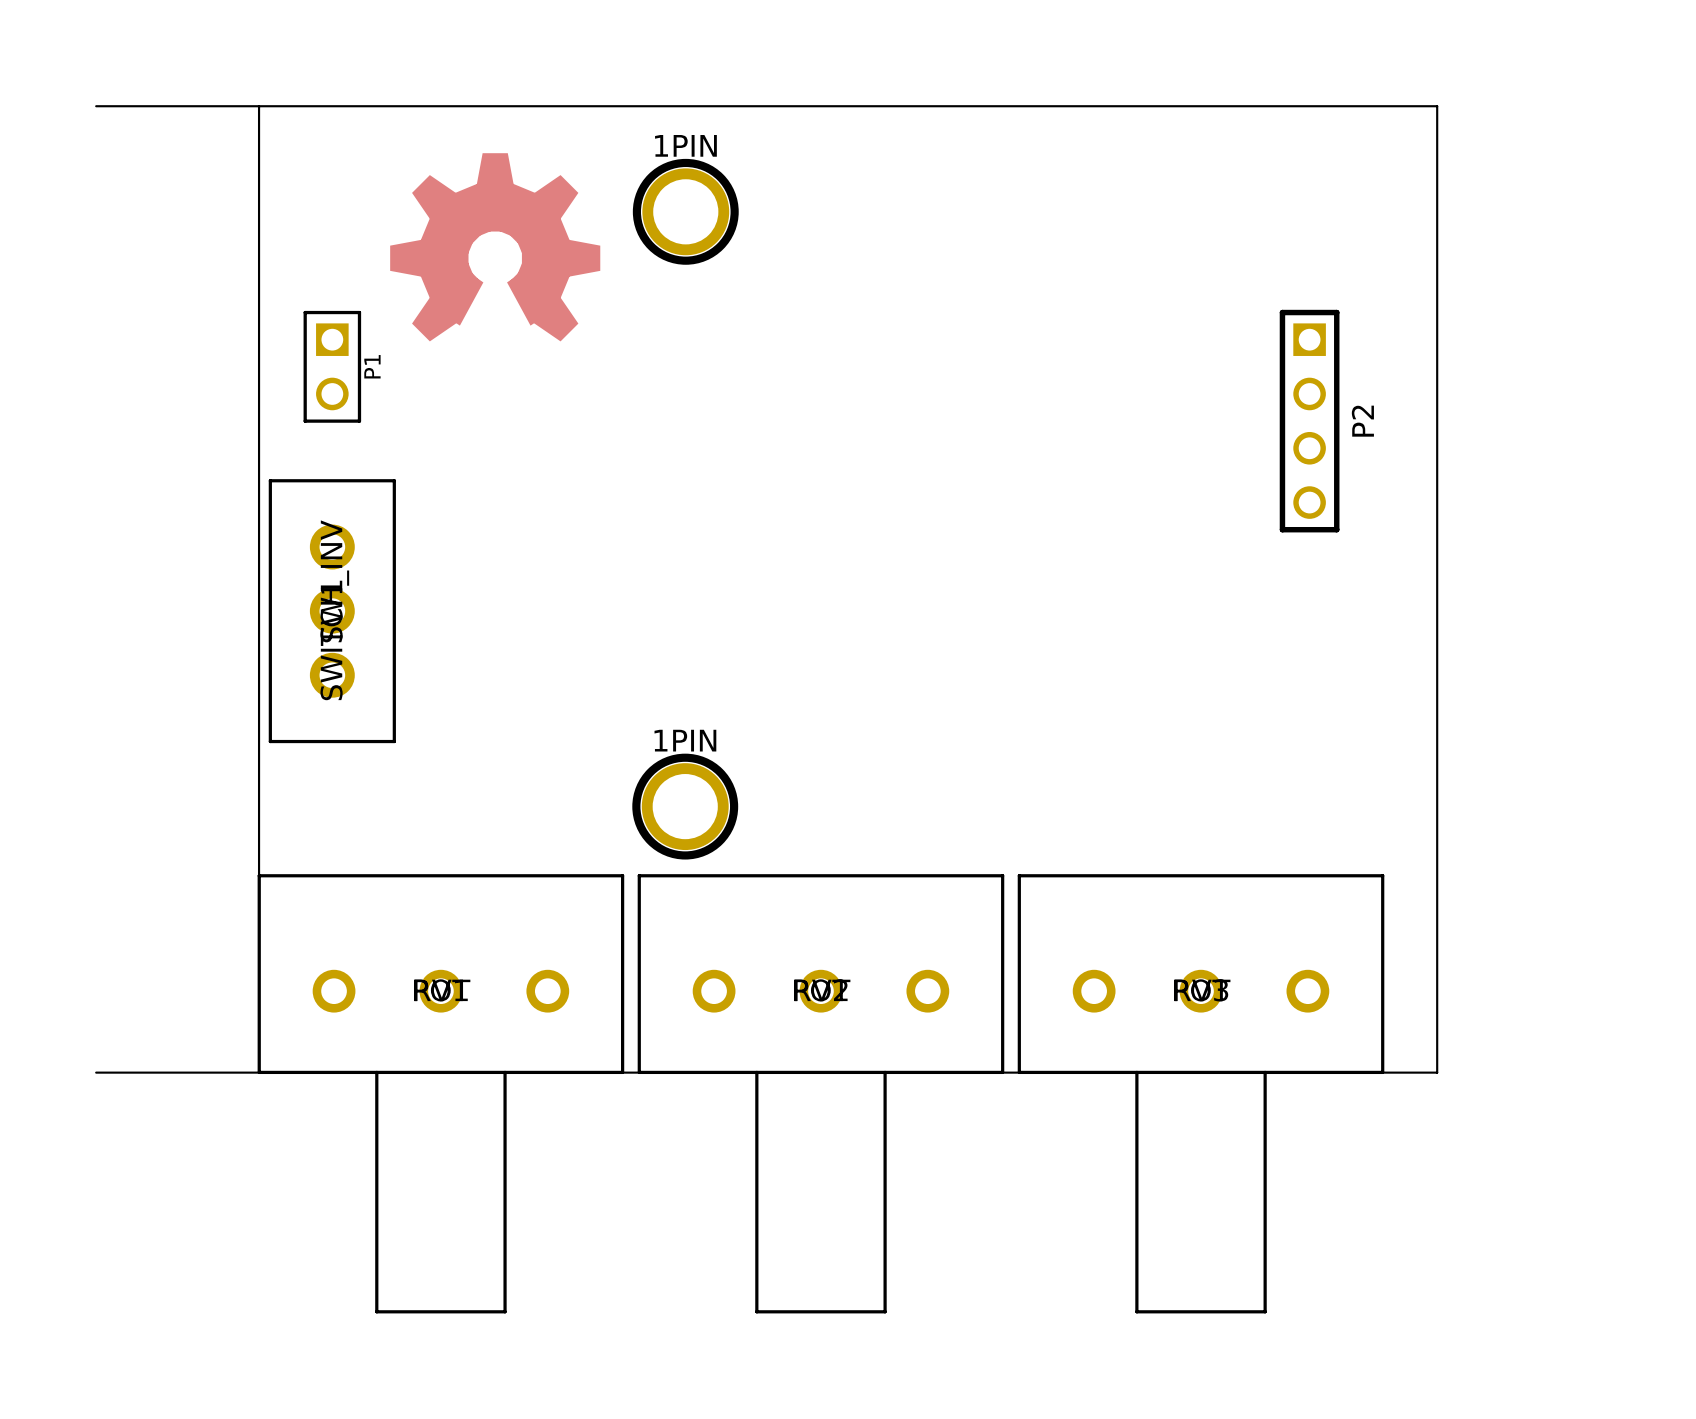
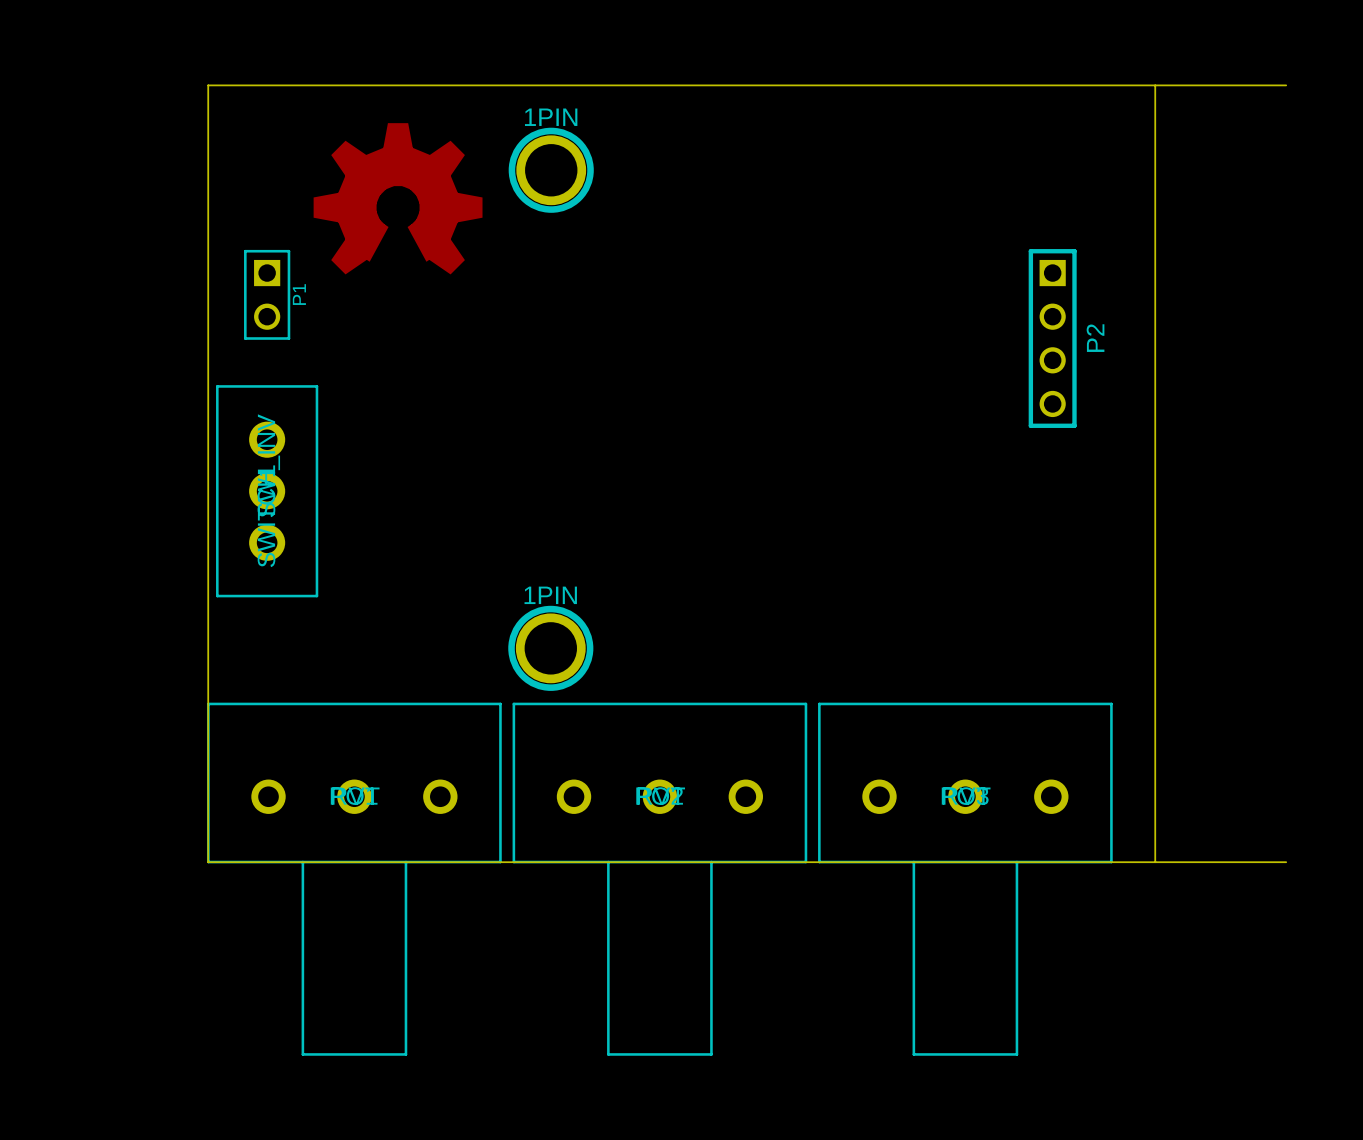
board edge: (96, 106) (259, 106) -> none
board edge: none -> (1155, 85) (1286, 85)
board edge: (96, 1072) (259, 1072) -> none
board edge: none -> (1155, 862) (1286, 862)

